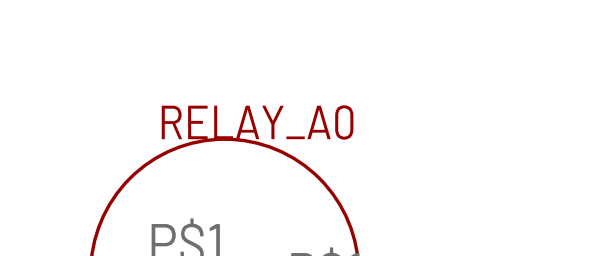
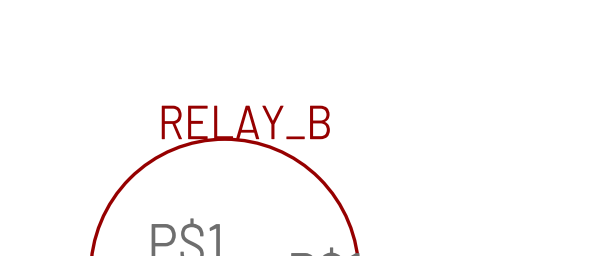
RELAY_A0 name: RELAY_A0 (257, 122) -> RELAY_B (245, 122)

